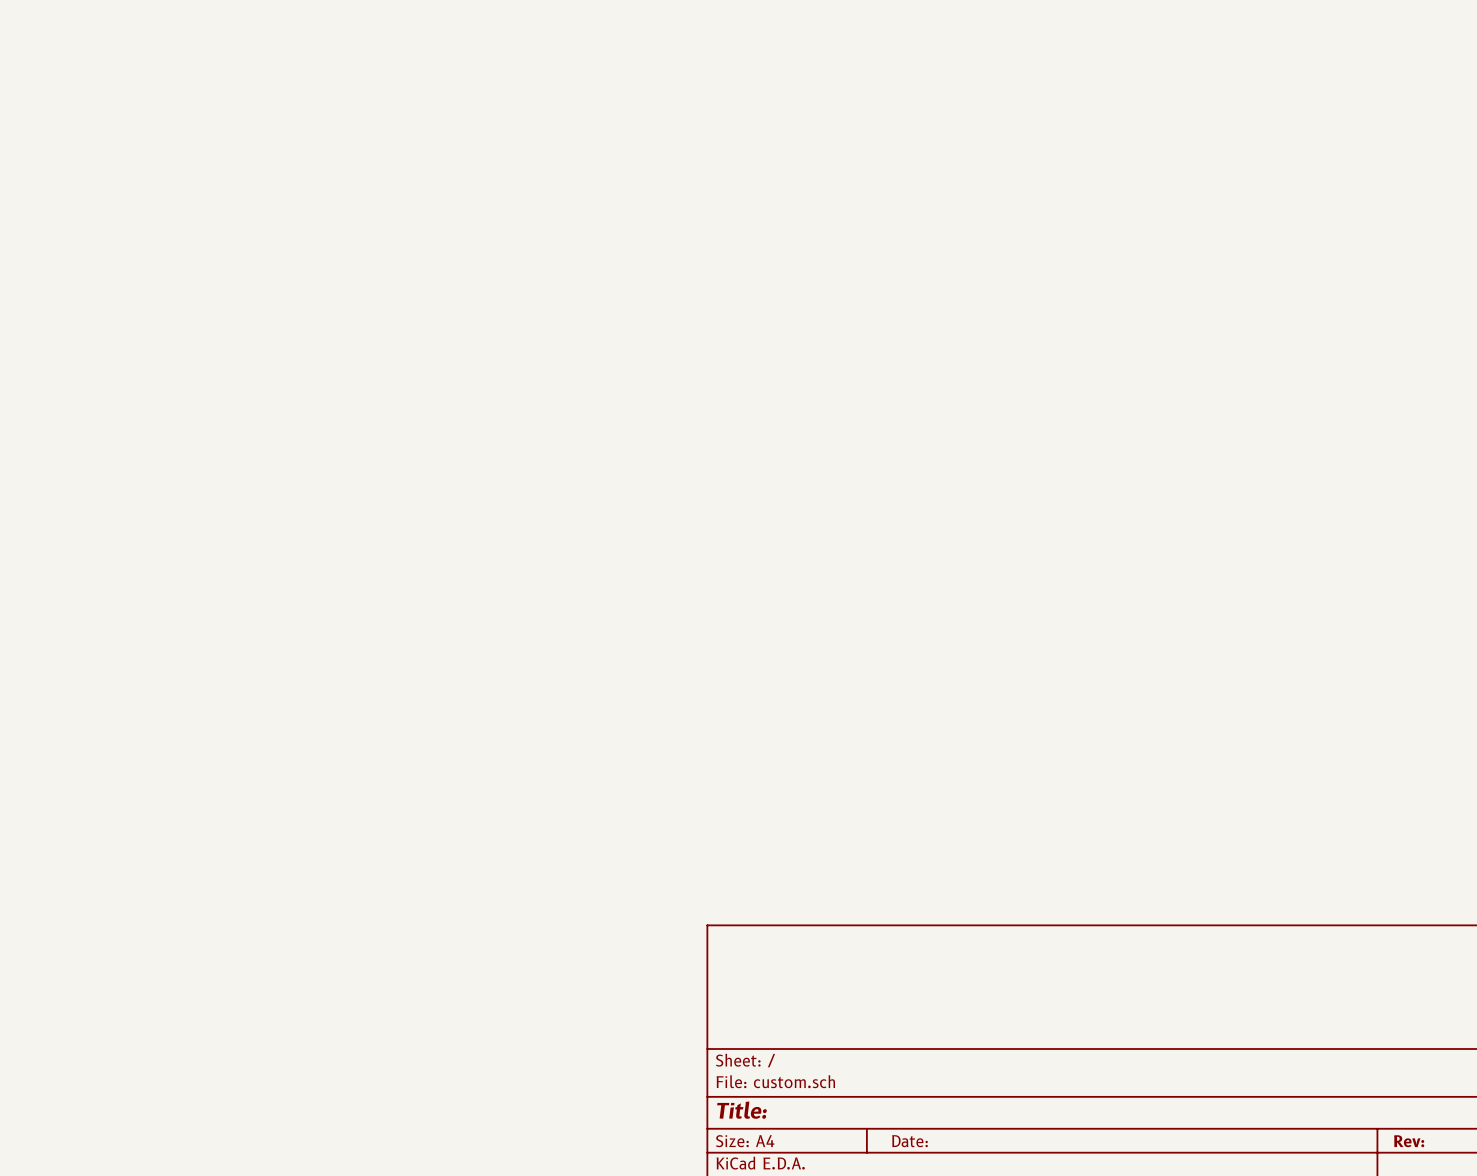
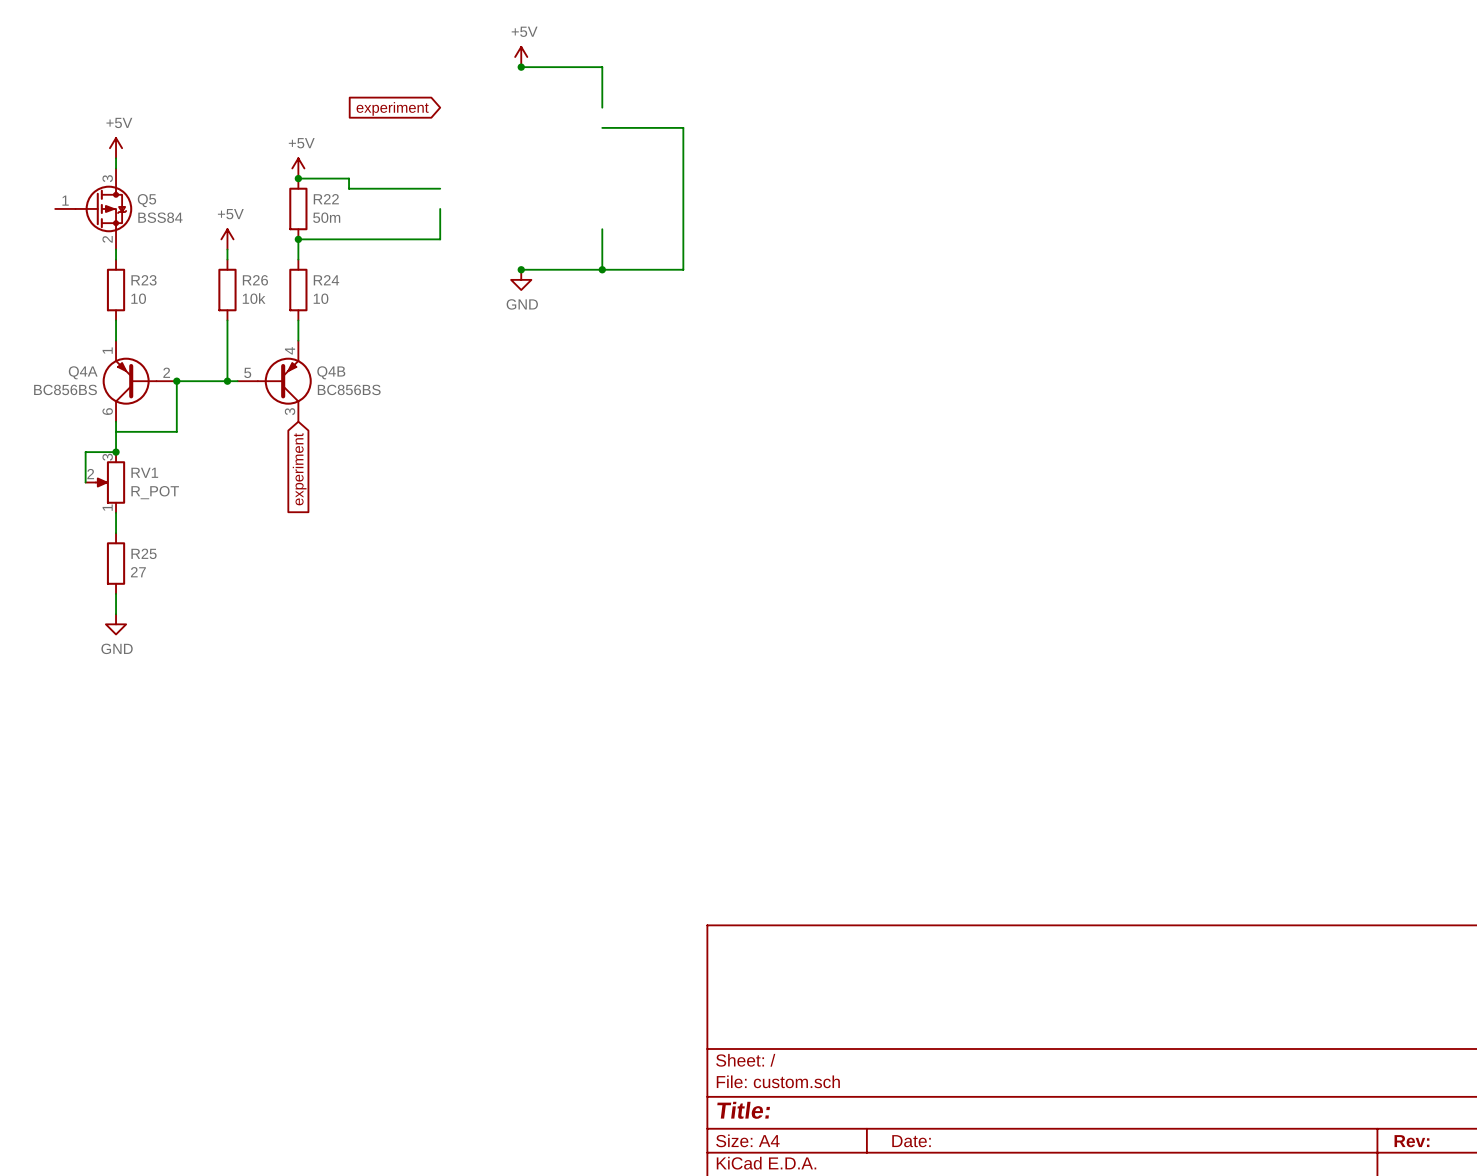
power symbol: none -> +5V (521, 57)
wire: none -> (521, 67) (602, 67) (602, 107)
junction: none -> (521, 67)
global label: none -> experiment (392, 108)
wire: none -> (602, 127) (683, 127) (683, 269) (521, 269)
power symbol: none -> +5V (116, 148)
wire: none -> (116, 158) (116, 168)
power symbol: none -> +5V (298, 168)
wire: none -> (298, 178) (349, 178) (349, 188) (440, 188)
junction: none -> (298, 178)
Q5: none -> BSS84 (93, 208)
R22: none -> 50m (298, 208)
wire: none -> (440, 208) (440, 239) (298, 239) (298, 259)
wire: none -> (602, 229) (602, 269)
power symbol: none -> +5V (227, 239)
junction: none -> (298, 239)
wire: none -> (116, 249) (116, 259)
wire: none -> (227, 249) (227, 259)
junction: none -> (521, 269)
junction: none -> (602, 269)
power symbol: none -> GND (521, 279)
R23: none -> 10 (116, 290)
R26: none -> 10k (227, 290)
R24: none -> 10 (298, 290)
wire: none -> (116, 320) (116, 340)
wire: none -> (227, 320) (227, 381)
wire: none -> (298, 320) (298, 340)
Q4A: none -> BC856BS (139, 381)
junction: none -> (176, 381)
junction: none -> (227, 381)
wire: none -> (237, 381) (176, 381) (176, 431) (116, 431)
Q4B: none -> BC856BS (274, 381)
wire: none -> (116, 421) (116, 452) (85, 452) (85, 482)
junction: none -> (116, 452)
global label: none -> experiment (299, 469)
RV1: none -> R_POT (105, 482)
wire: none -> (116, 512) (116, 533)
R25: none -> 27 (116, 563)
wire: none -> (116, 593) (116, 614)
power symbol: none -> GND (116, 624)

